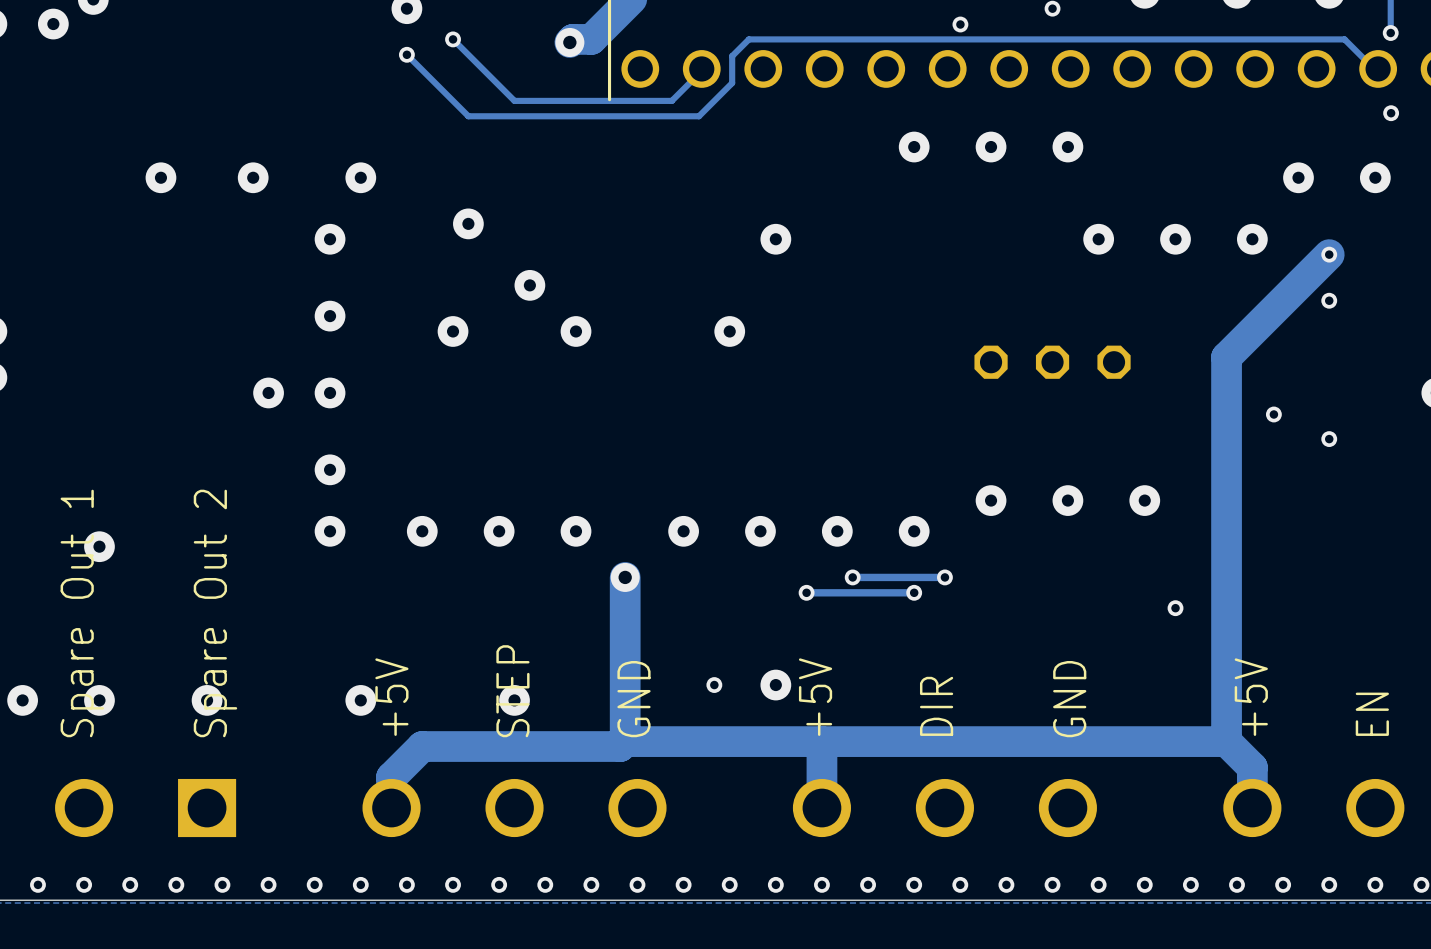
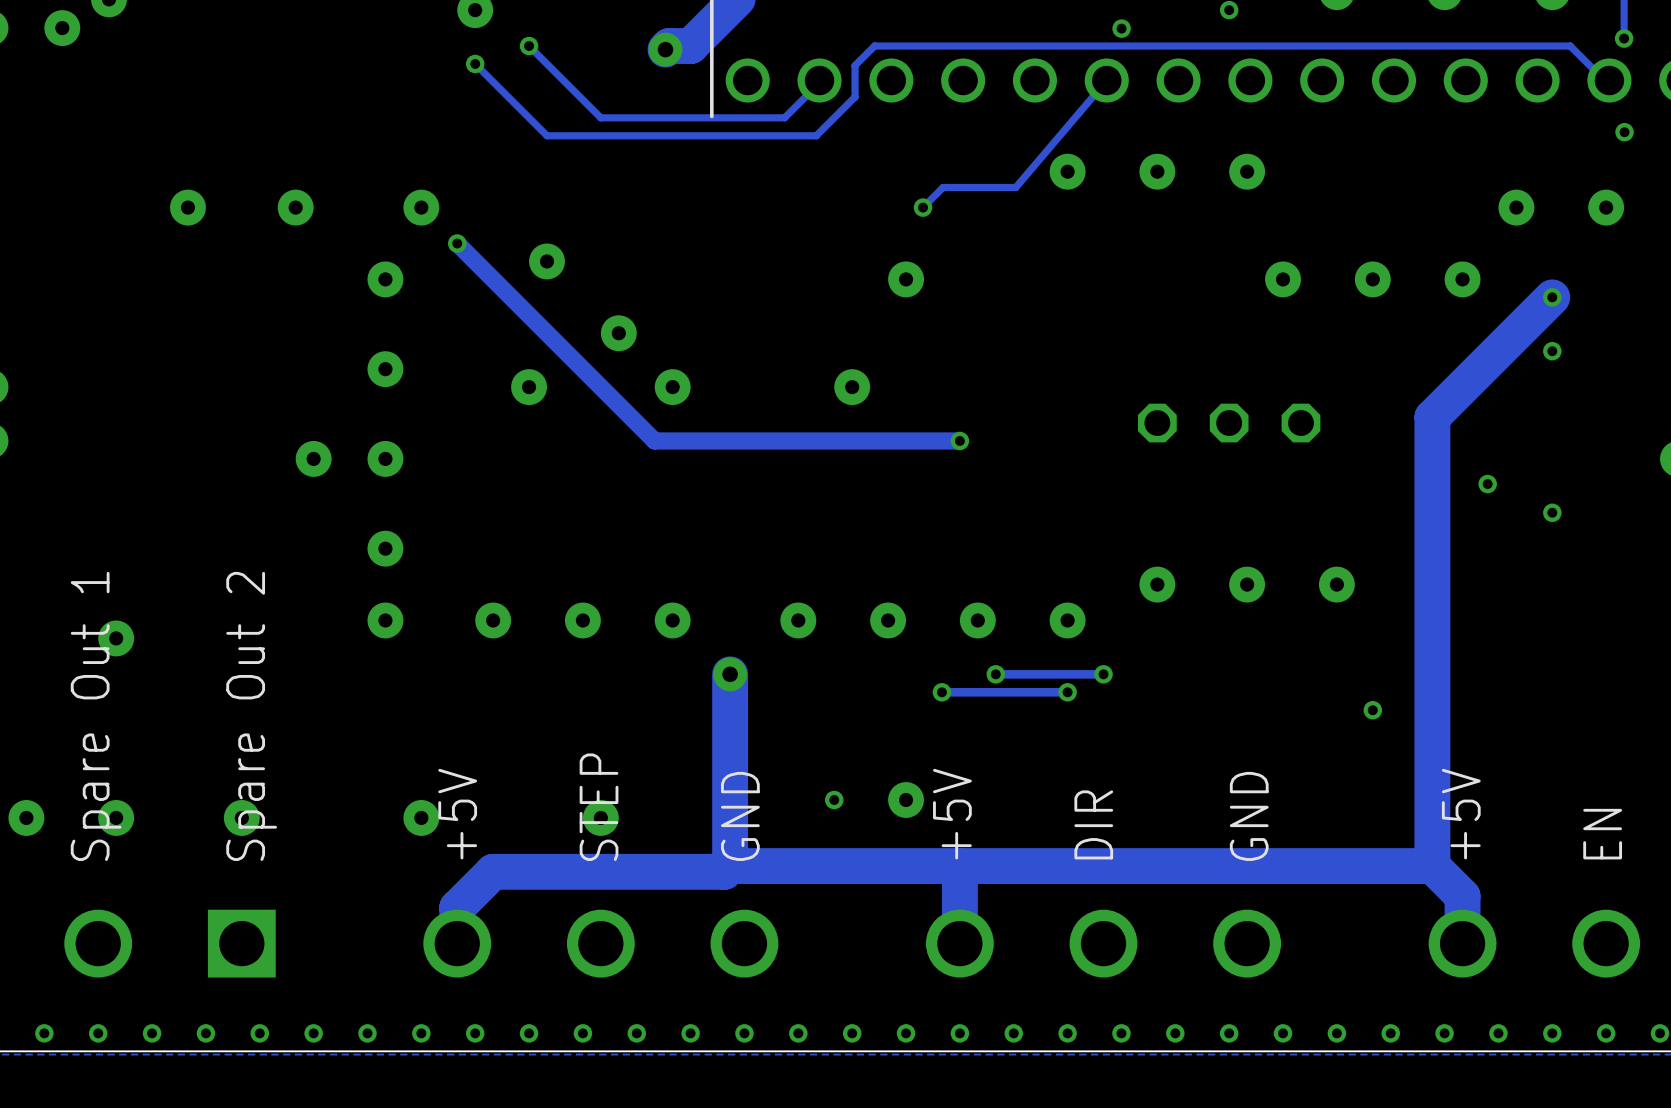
track: none -> (1106, 80) (1015, 187) (943, 187) (923, 207)
via: none -> (923, 207)
track: none -> (457, 243) (654, 440) (959, 440)
via: none -> (457, 243)
via: none -> (959, 440)

